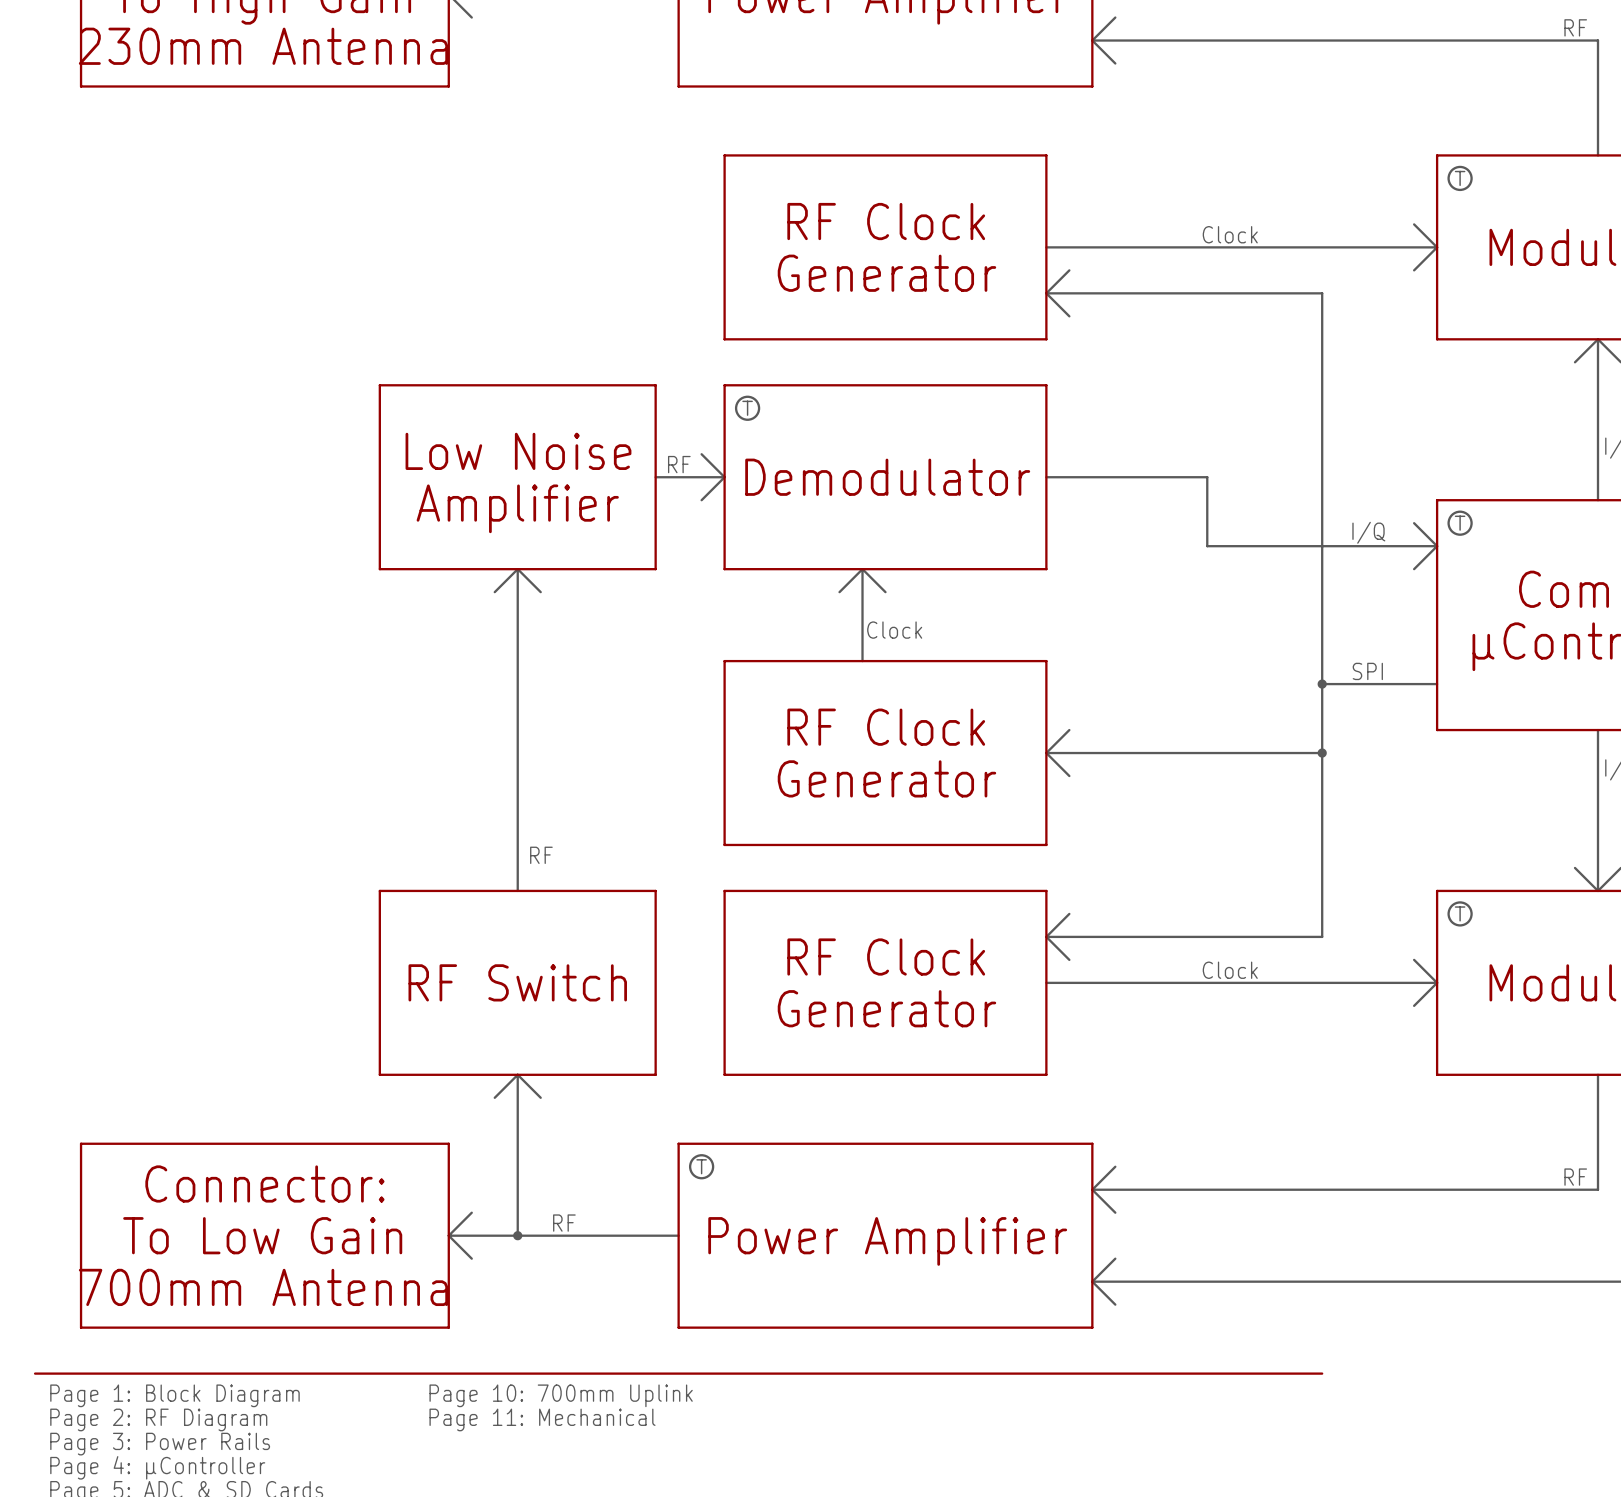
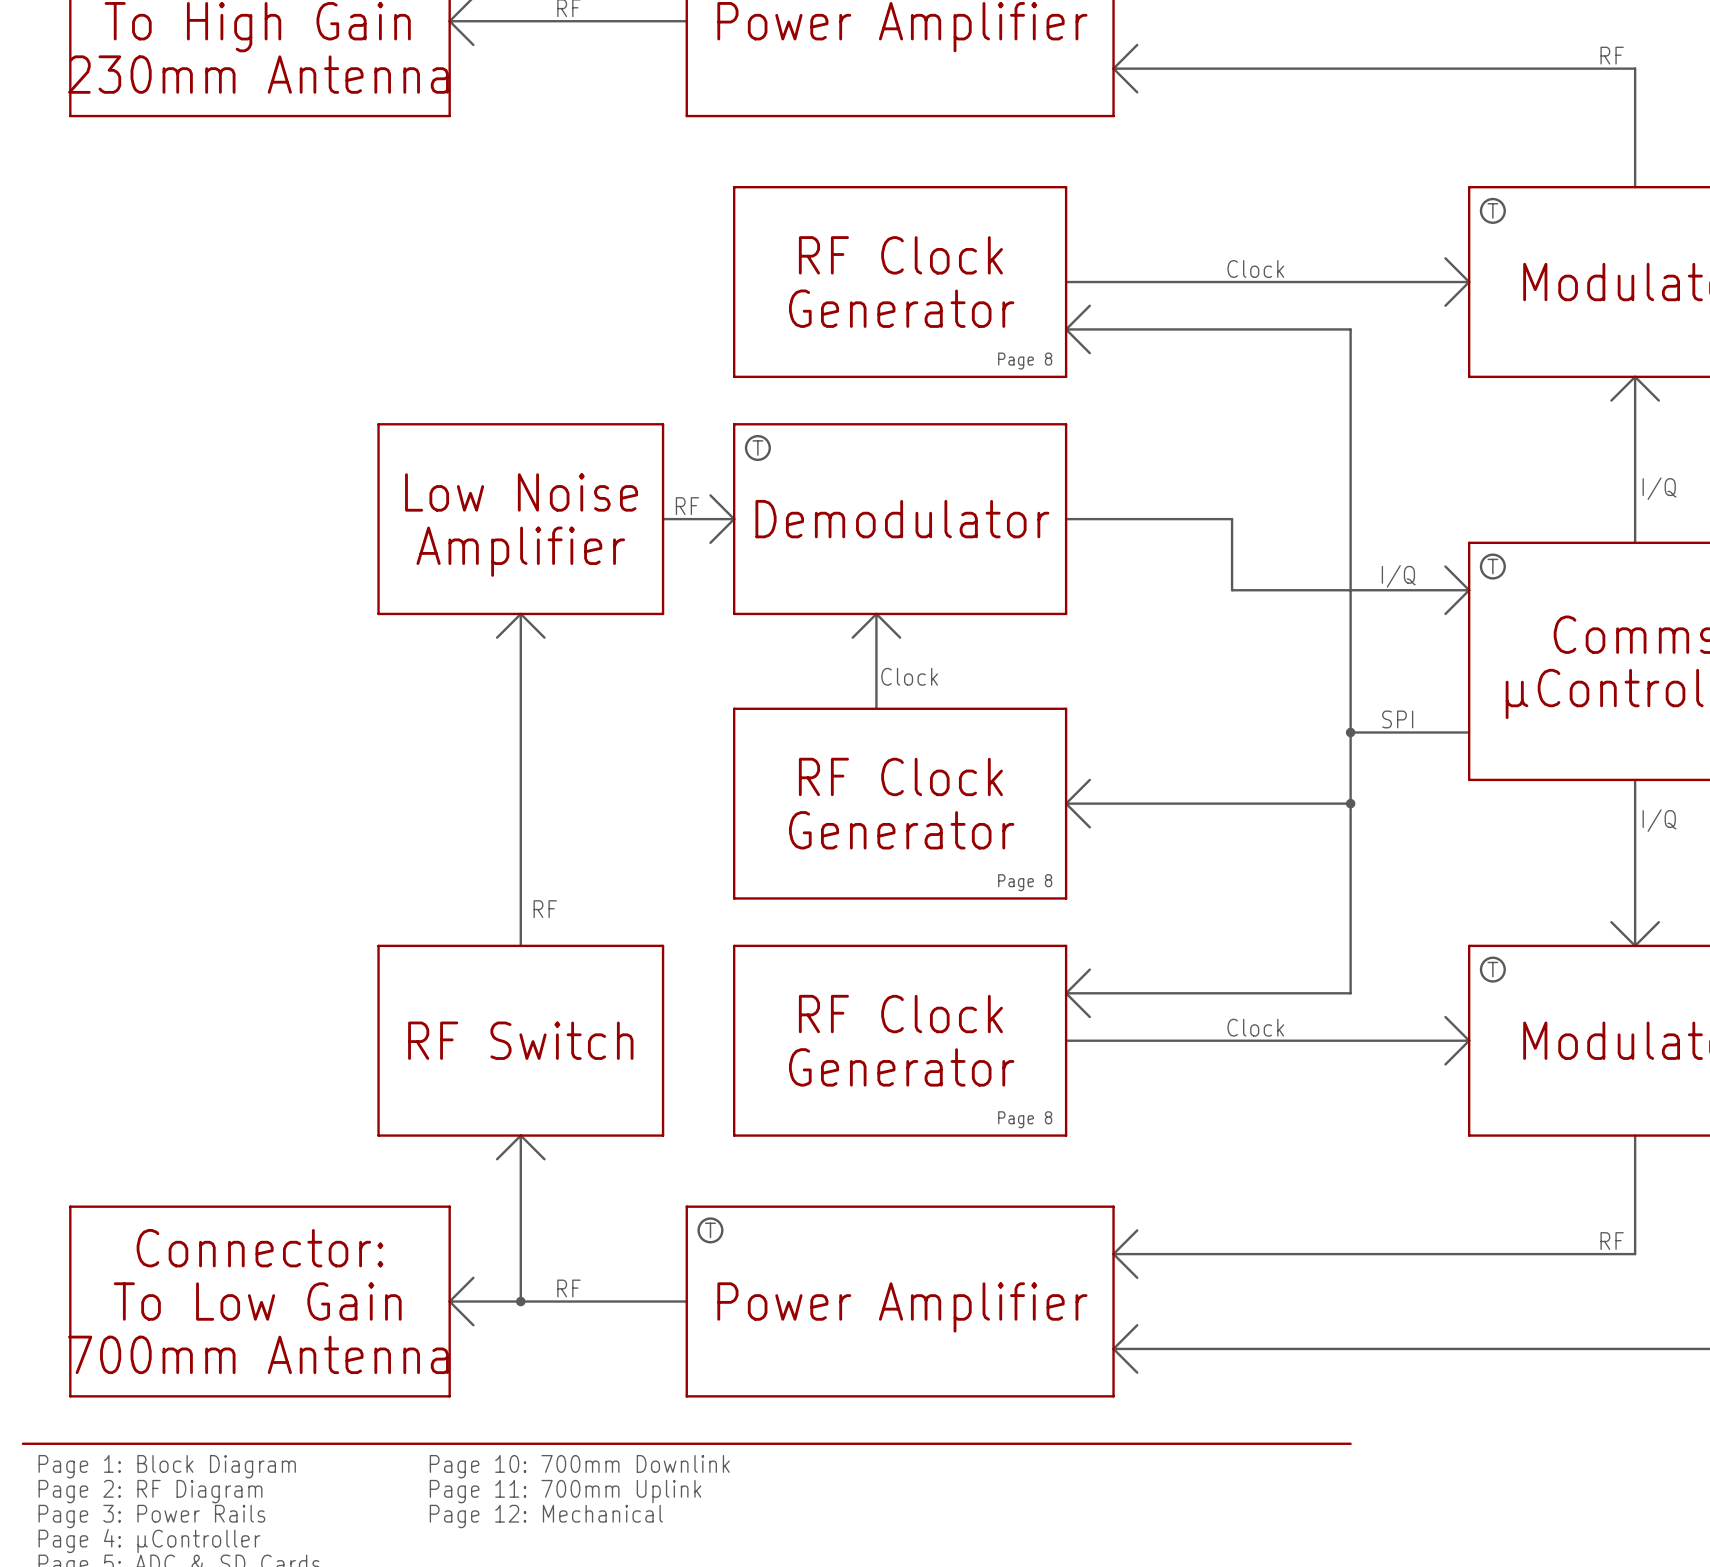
text: none -> Page 8 (1025, 361)
text: none -> Page 8 (1025, 882)
text: none -> Page 8 (1025, 1119)
text: Page 10: 700mm Uplink (561, 1395) -> Page 10: 700mm Downlink (579, 1466)
text: Page 11: Mechanical (542, 1419) -> Page 11: 700mm Uplink (565, 1491)
text: none -> Page 12: Mechanical (546, 1516)

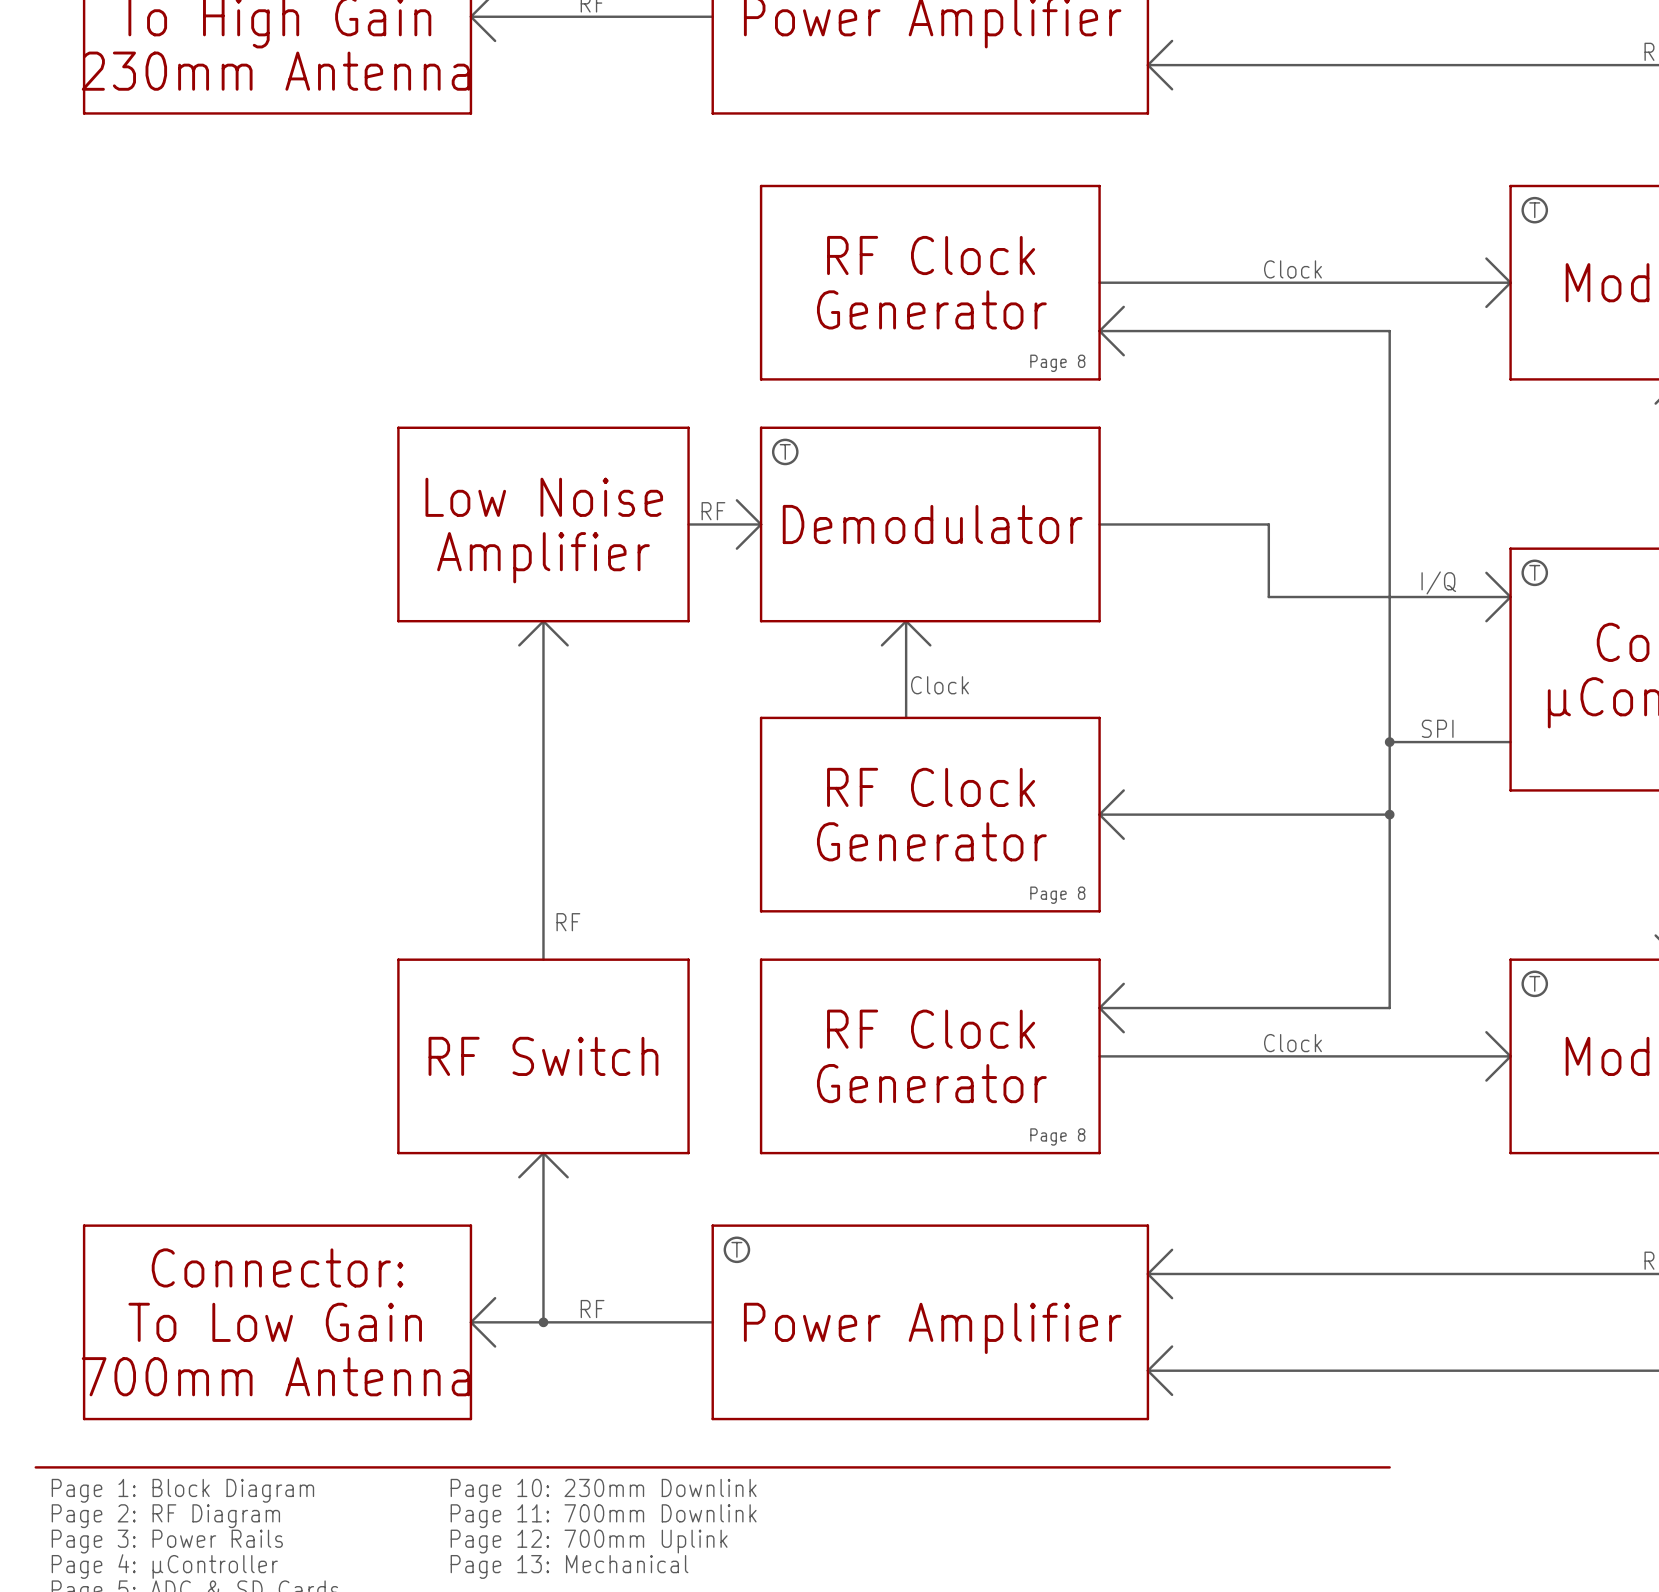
text: Page 10: 700mm Downlink (579, 1466) -> Page 10: 230mm Downlink (603, 1490)
text: Page 11: 700mm Uplink (565, 1491) -> Page 11: 700mm Downlink (603, 1516)
text: Page 12: Mechanical (546, 1516) -> Page 12: 700mm Uplink (589, 1541)
text: none -> Page 13: Mechanical (569, 1566)

